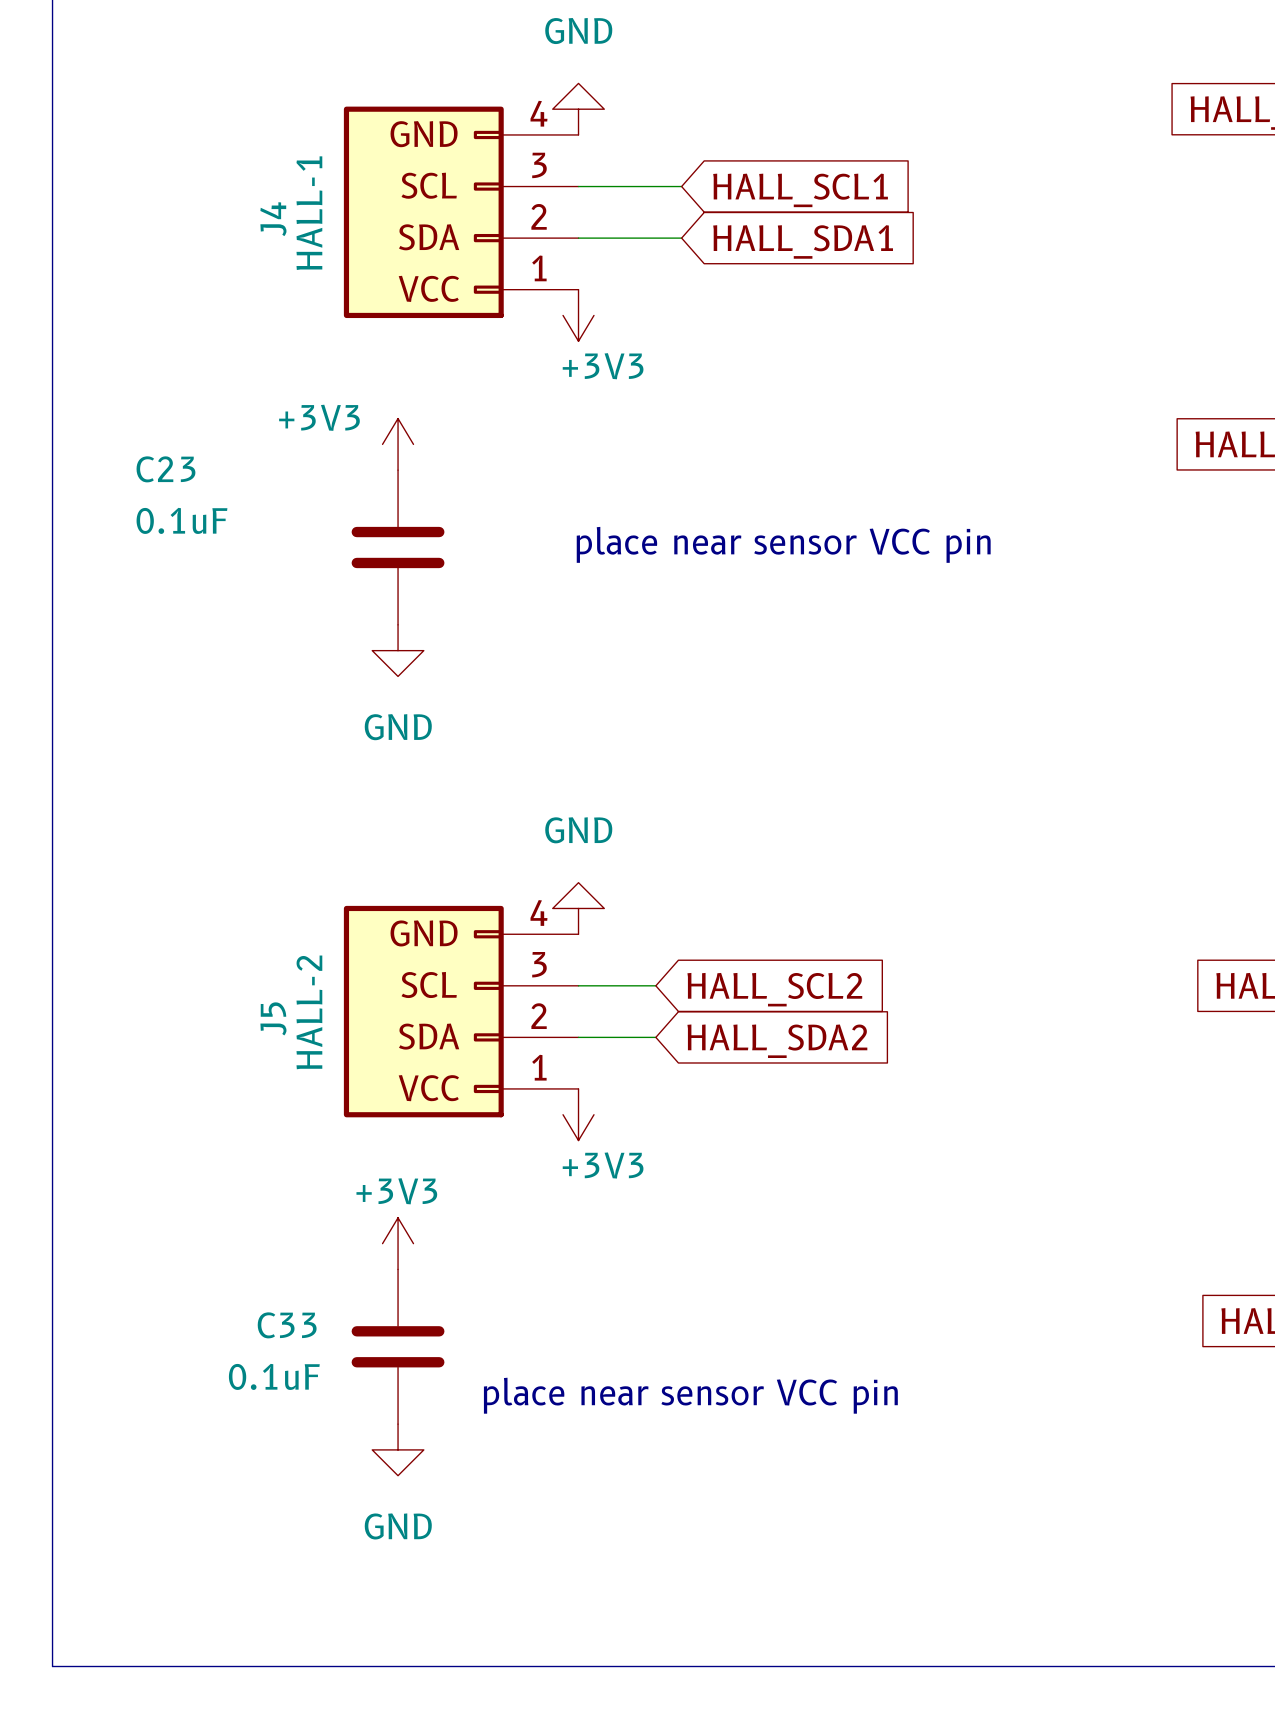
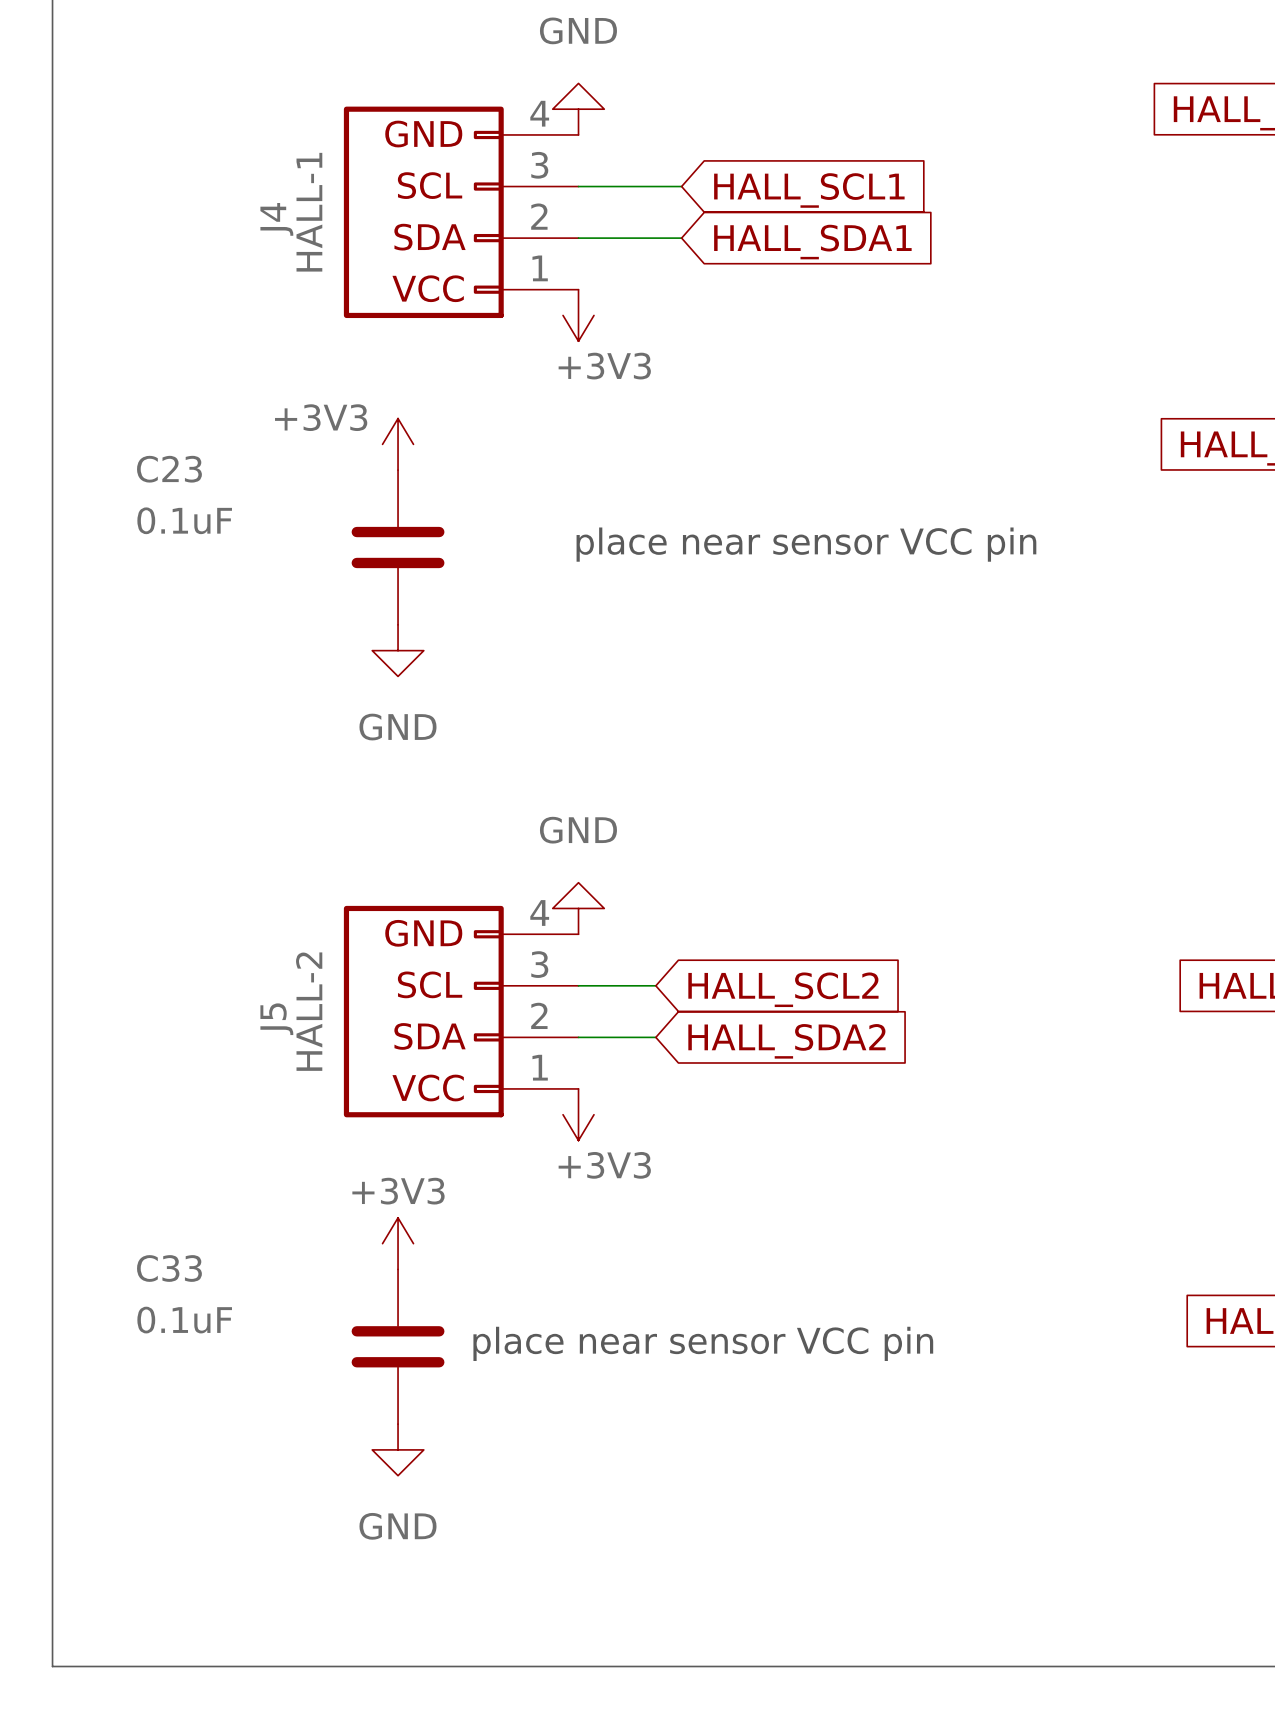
C33 name position: C33 (287, 1325) -> C33 (169, 1268)
C33 value position: 0.1uF (274, 1376) -> 0.1uF (184, 1320)
text position: place near sensor VCC pin (690, 1395) -> place near sensor VCC pin (703, 1343)

